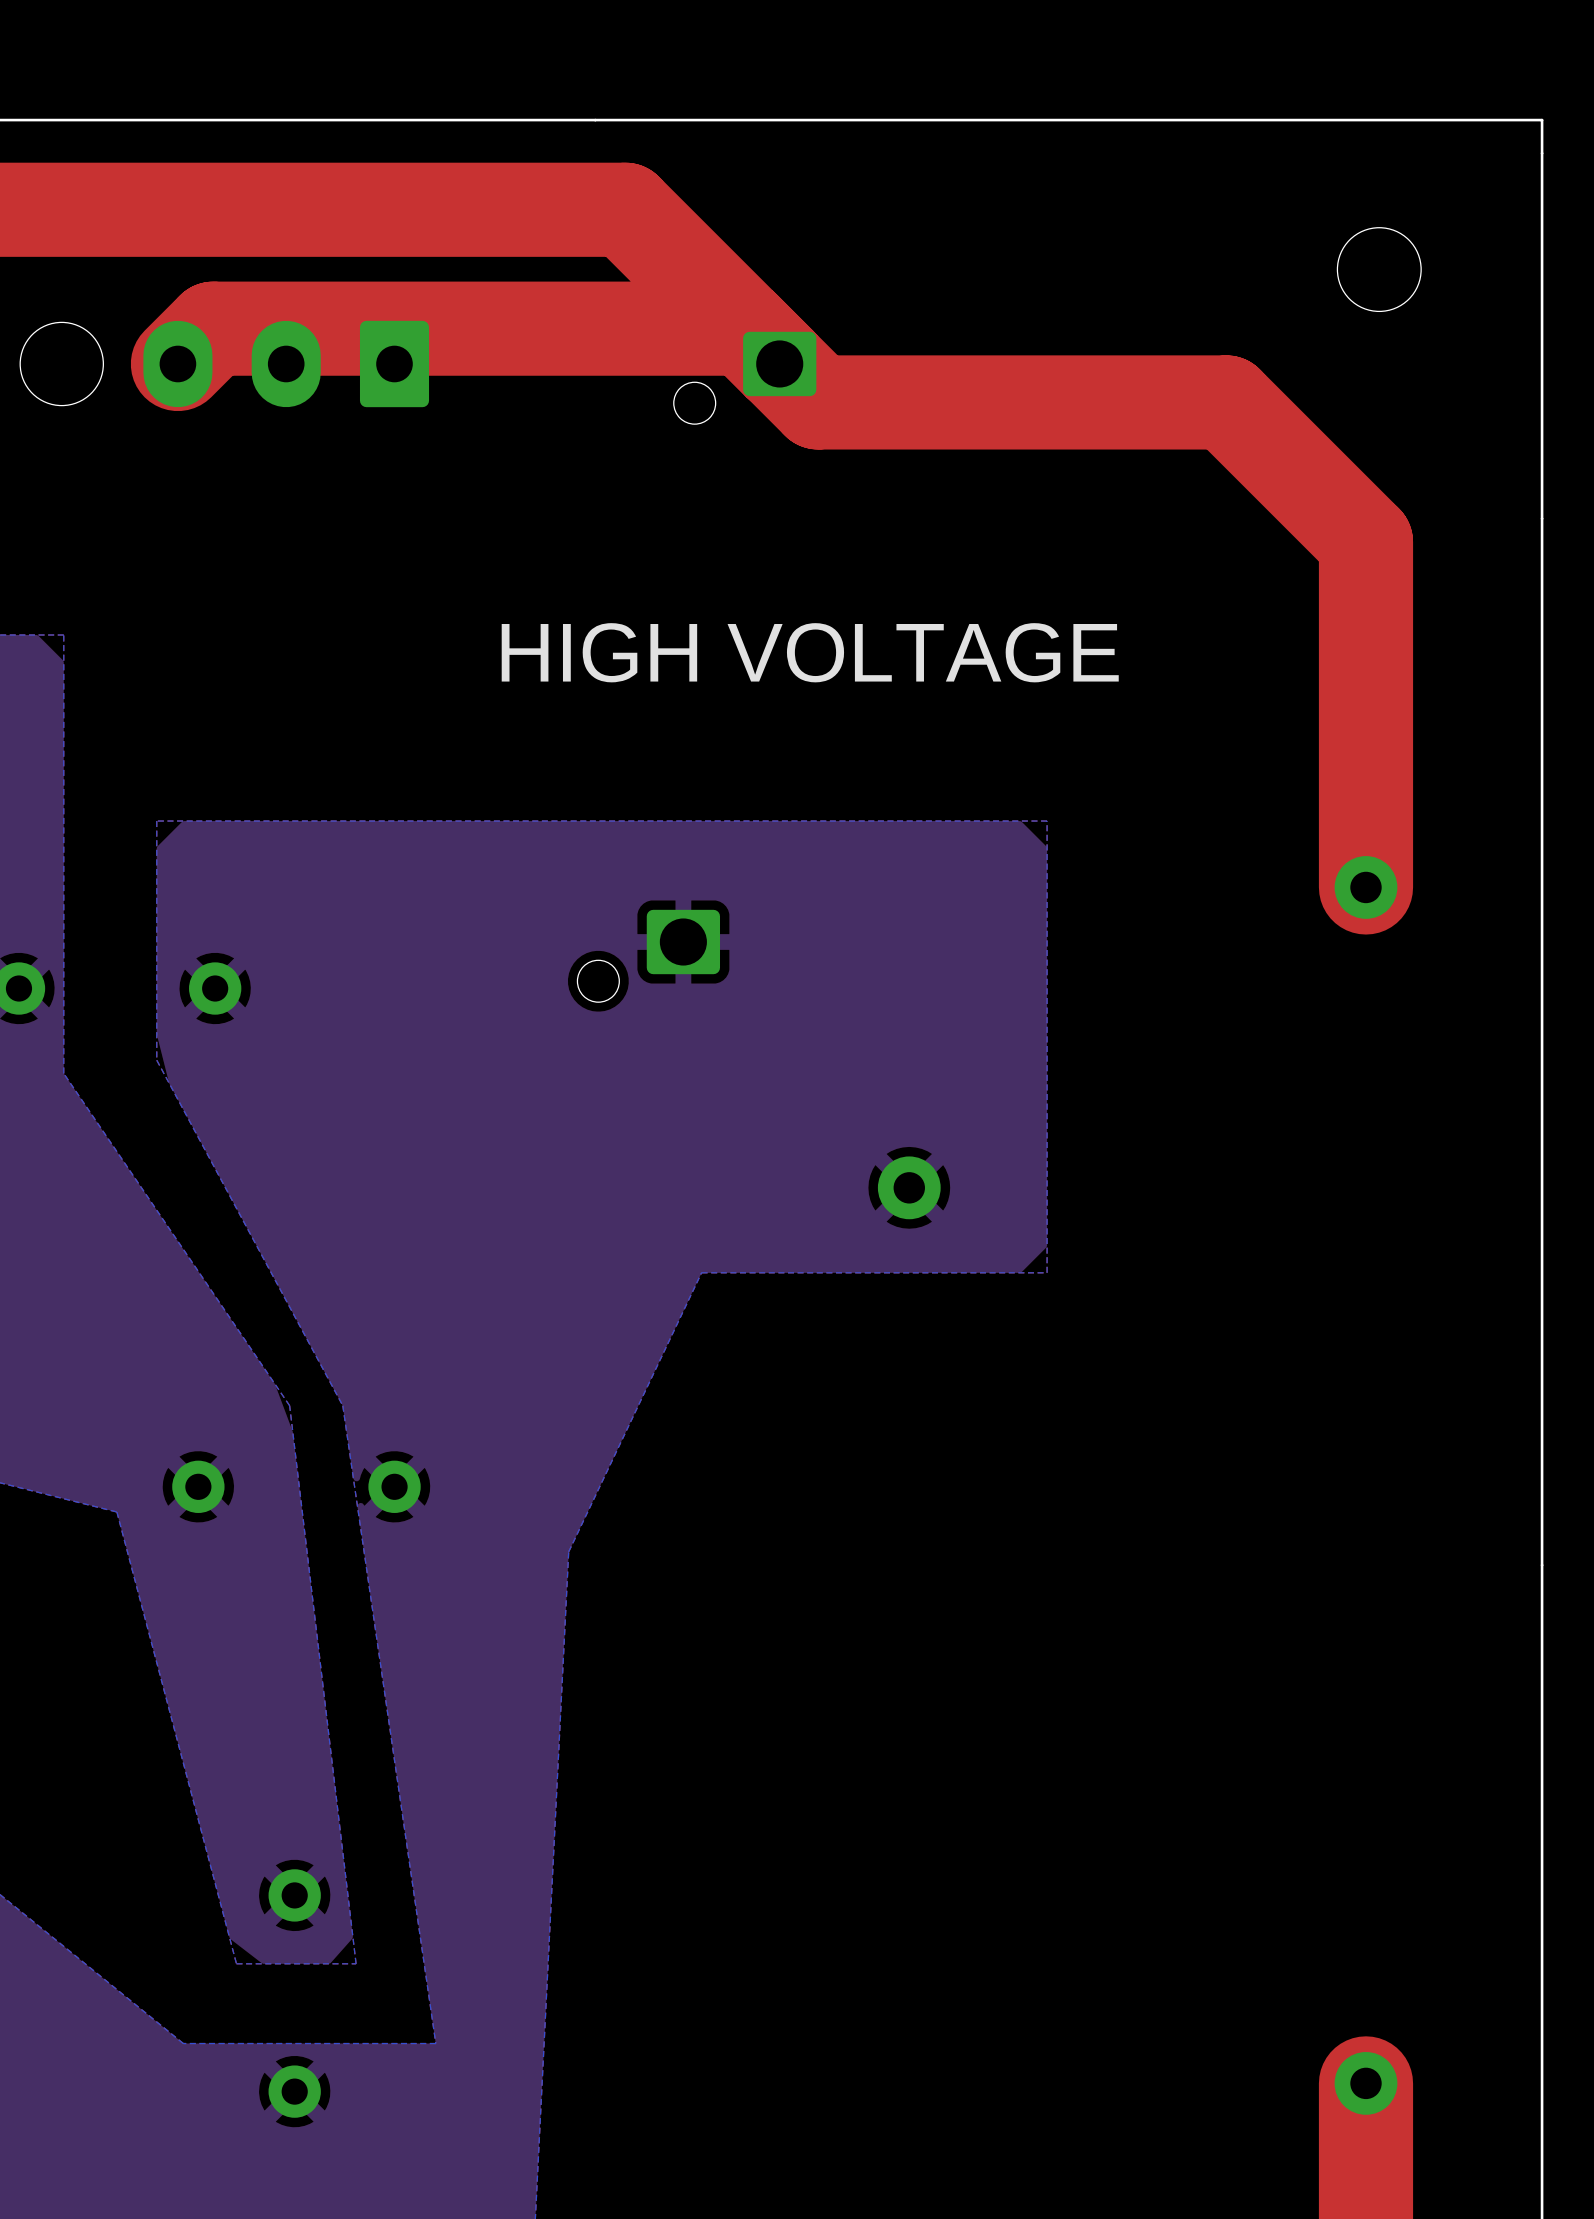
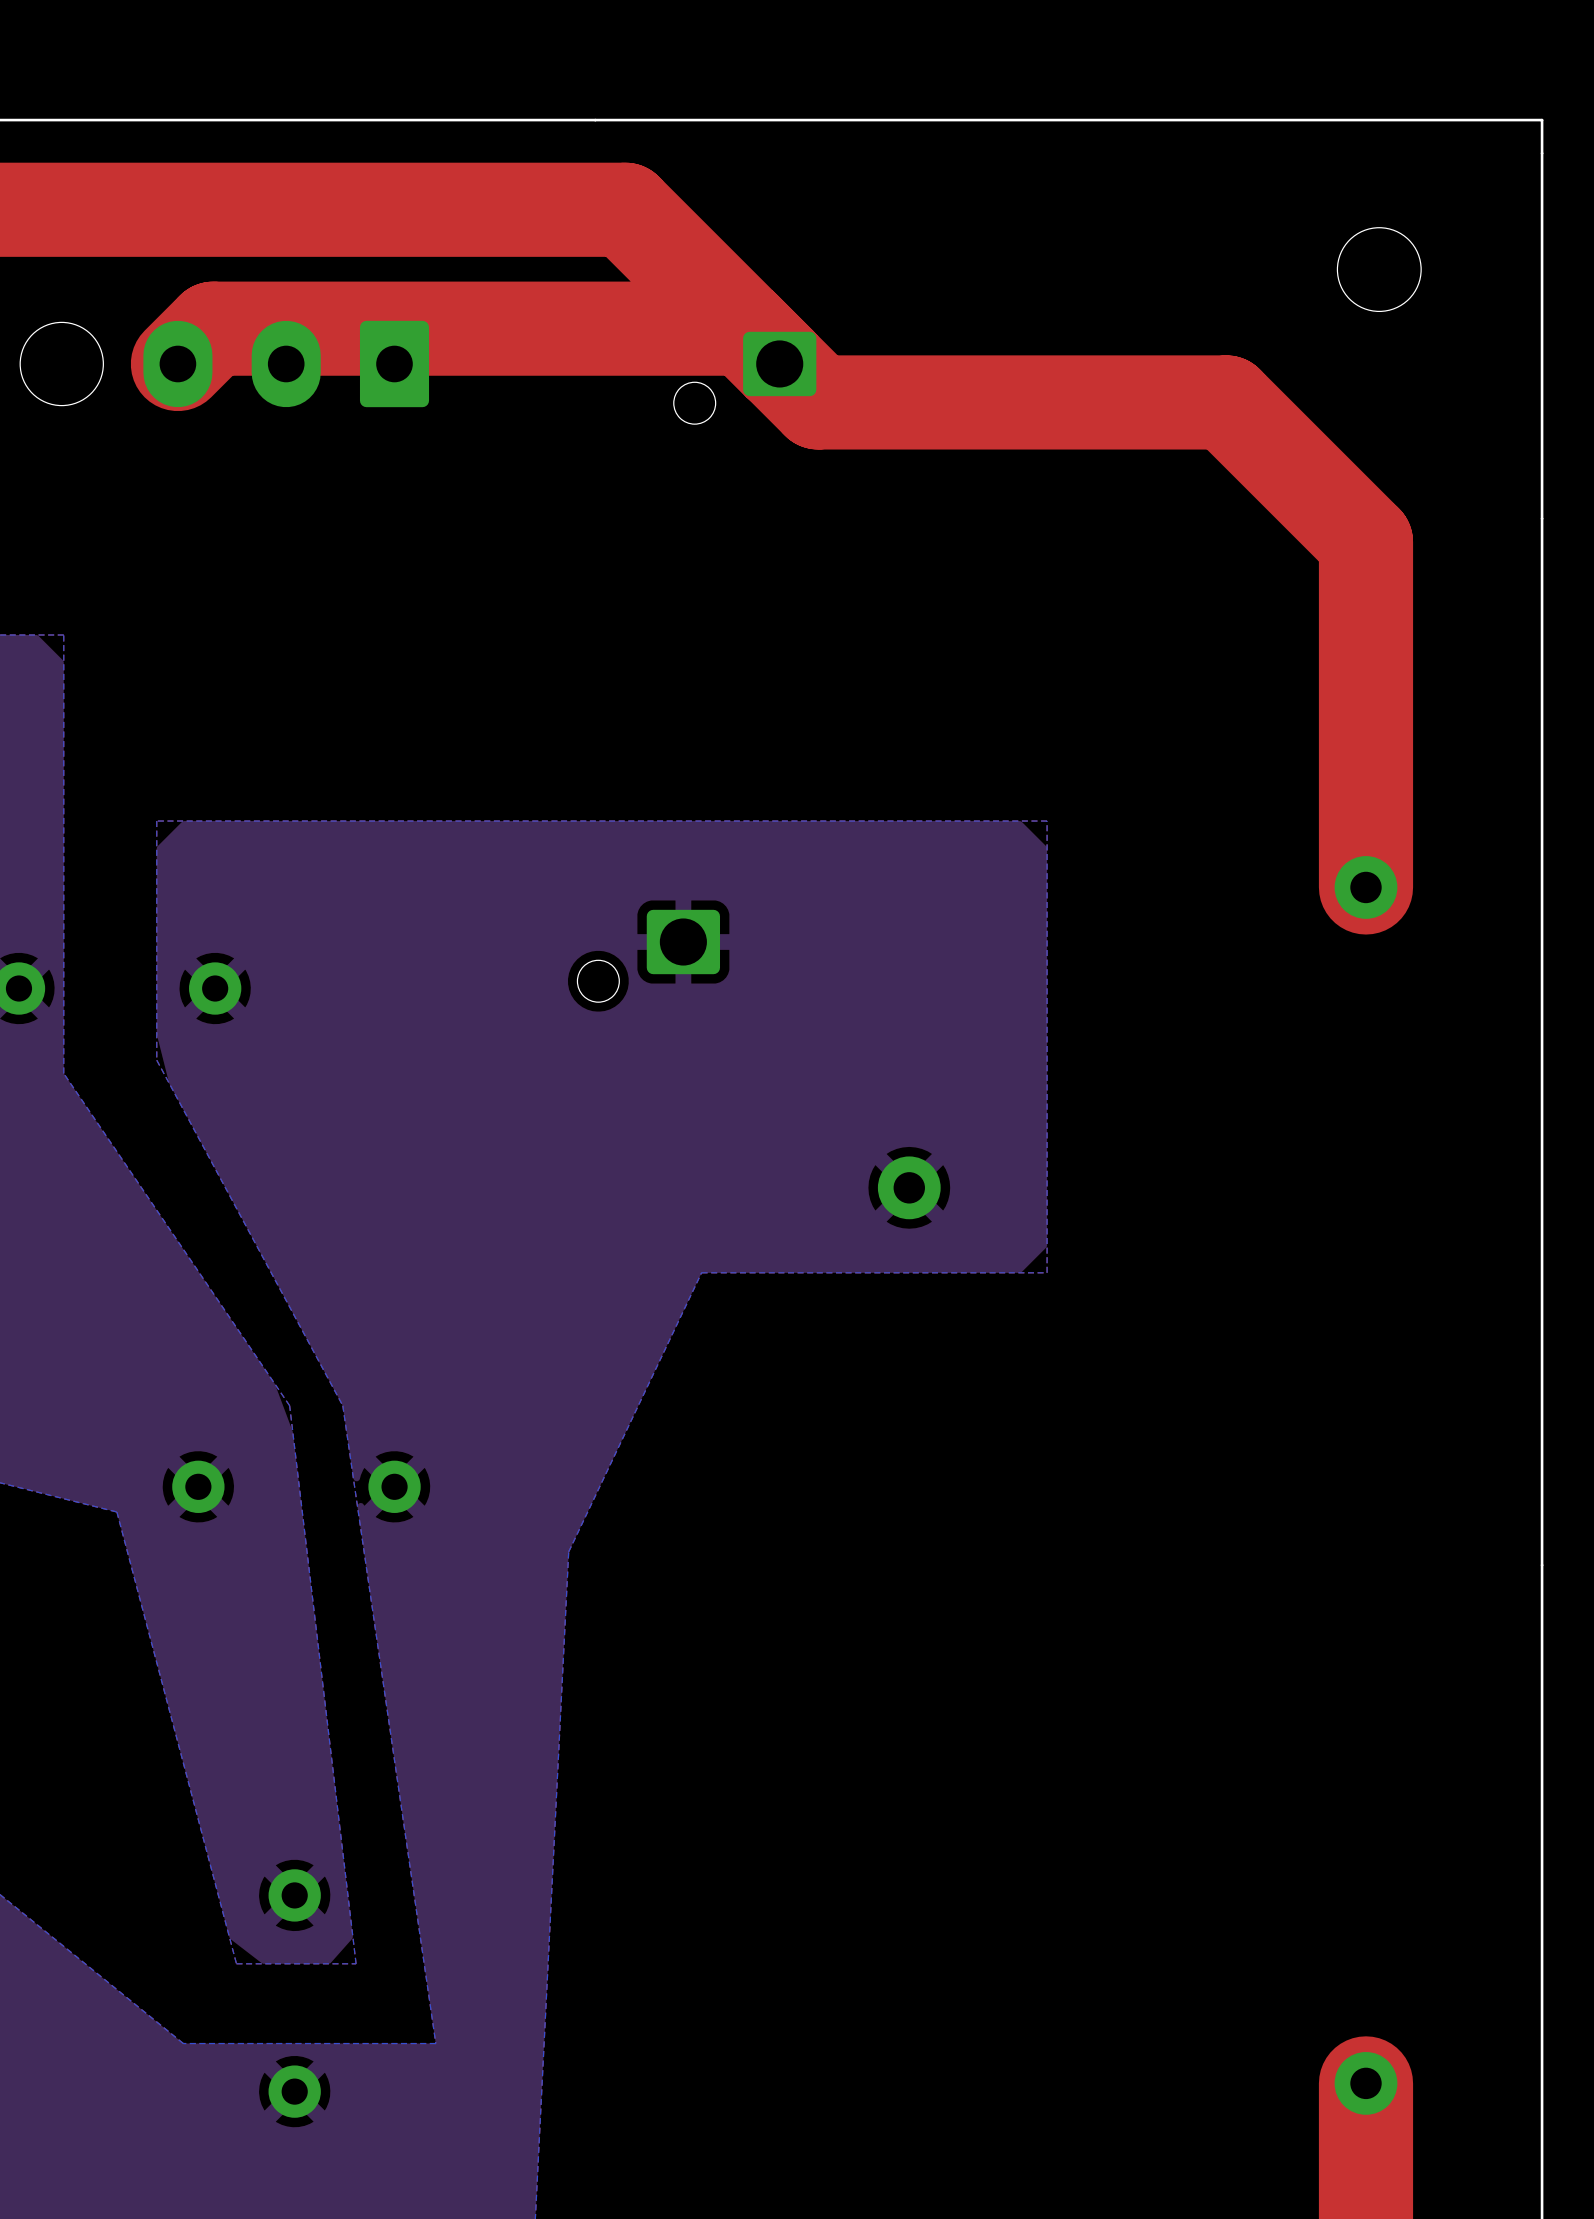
text: HIGH VOLTAGE (810, 652) -> none

